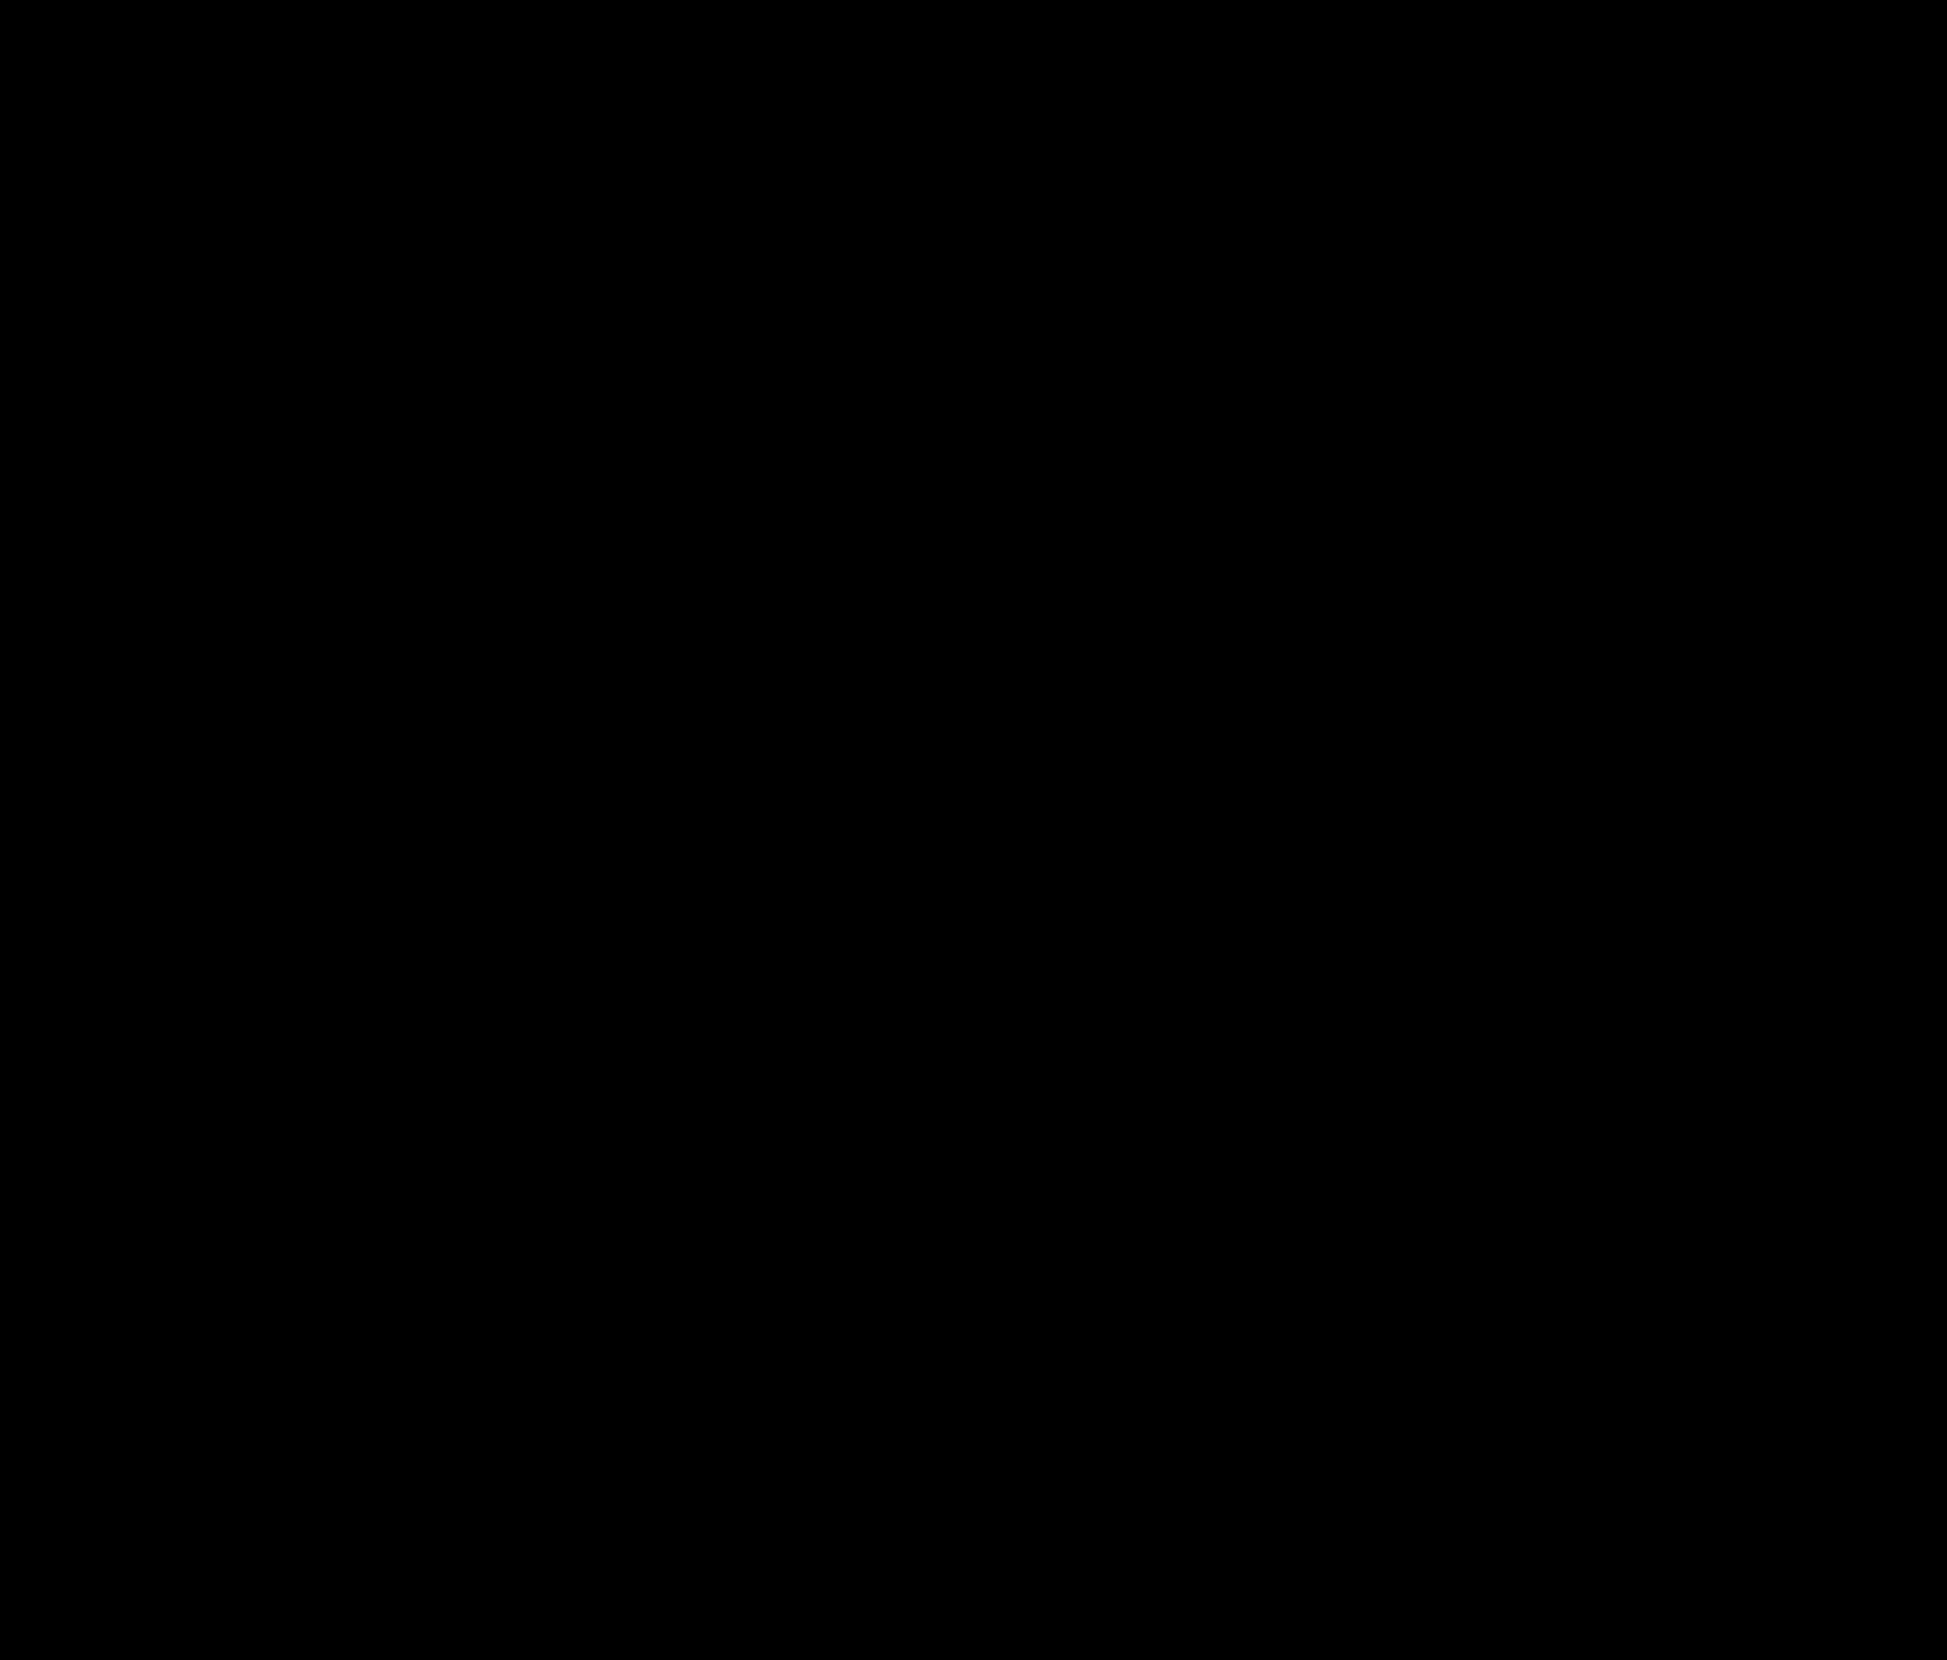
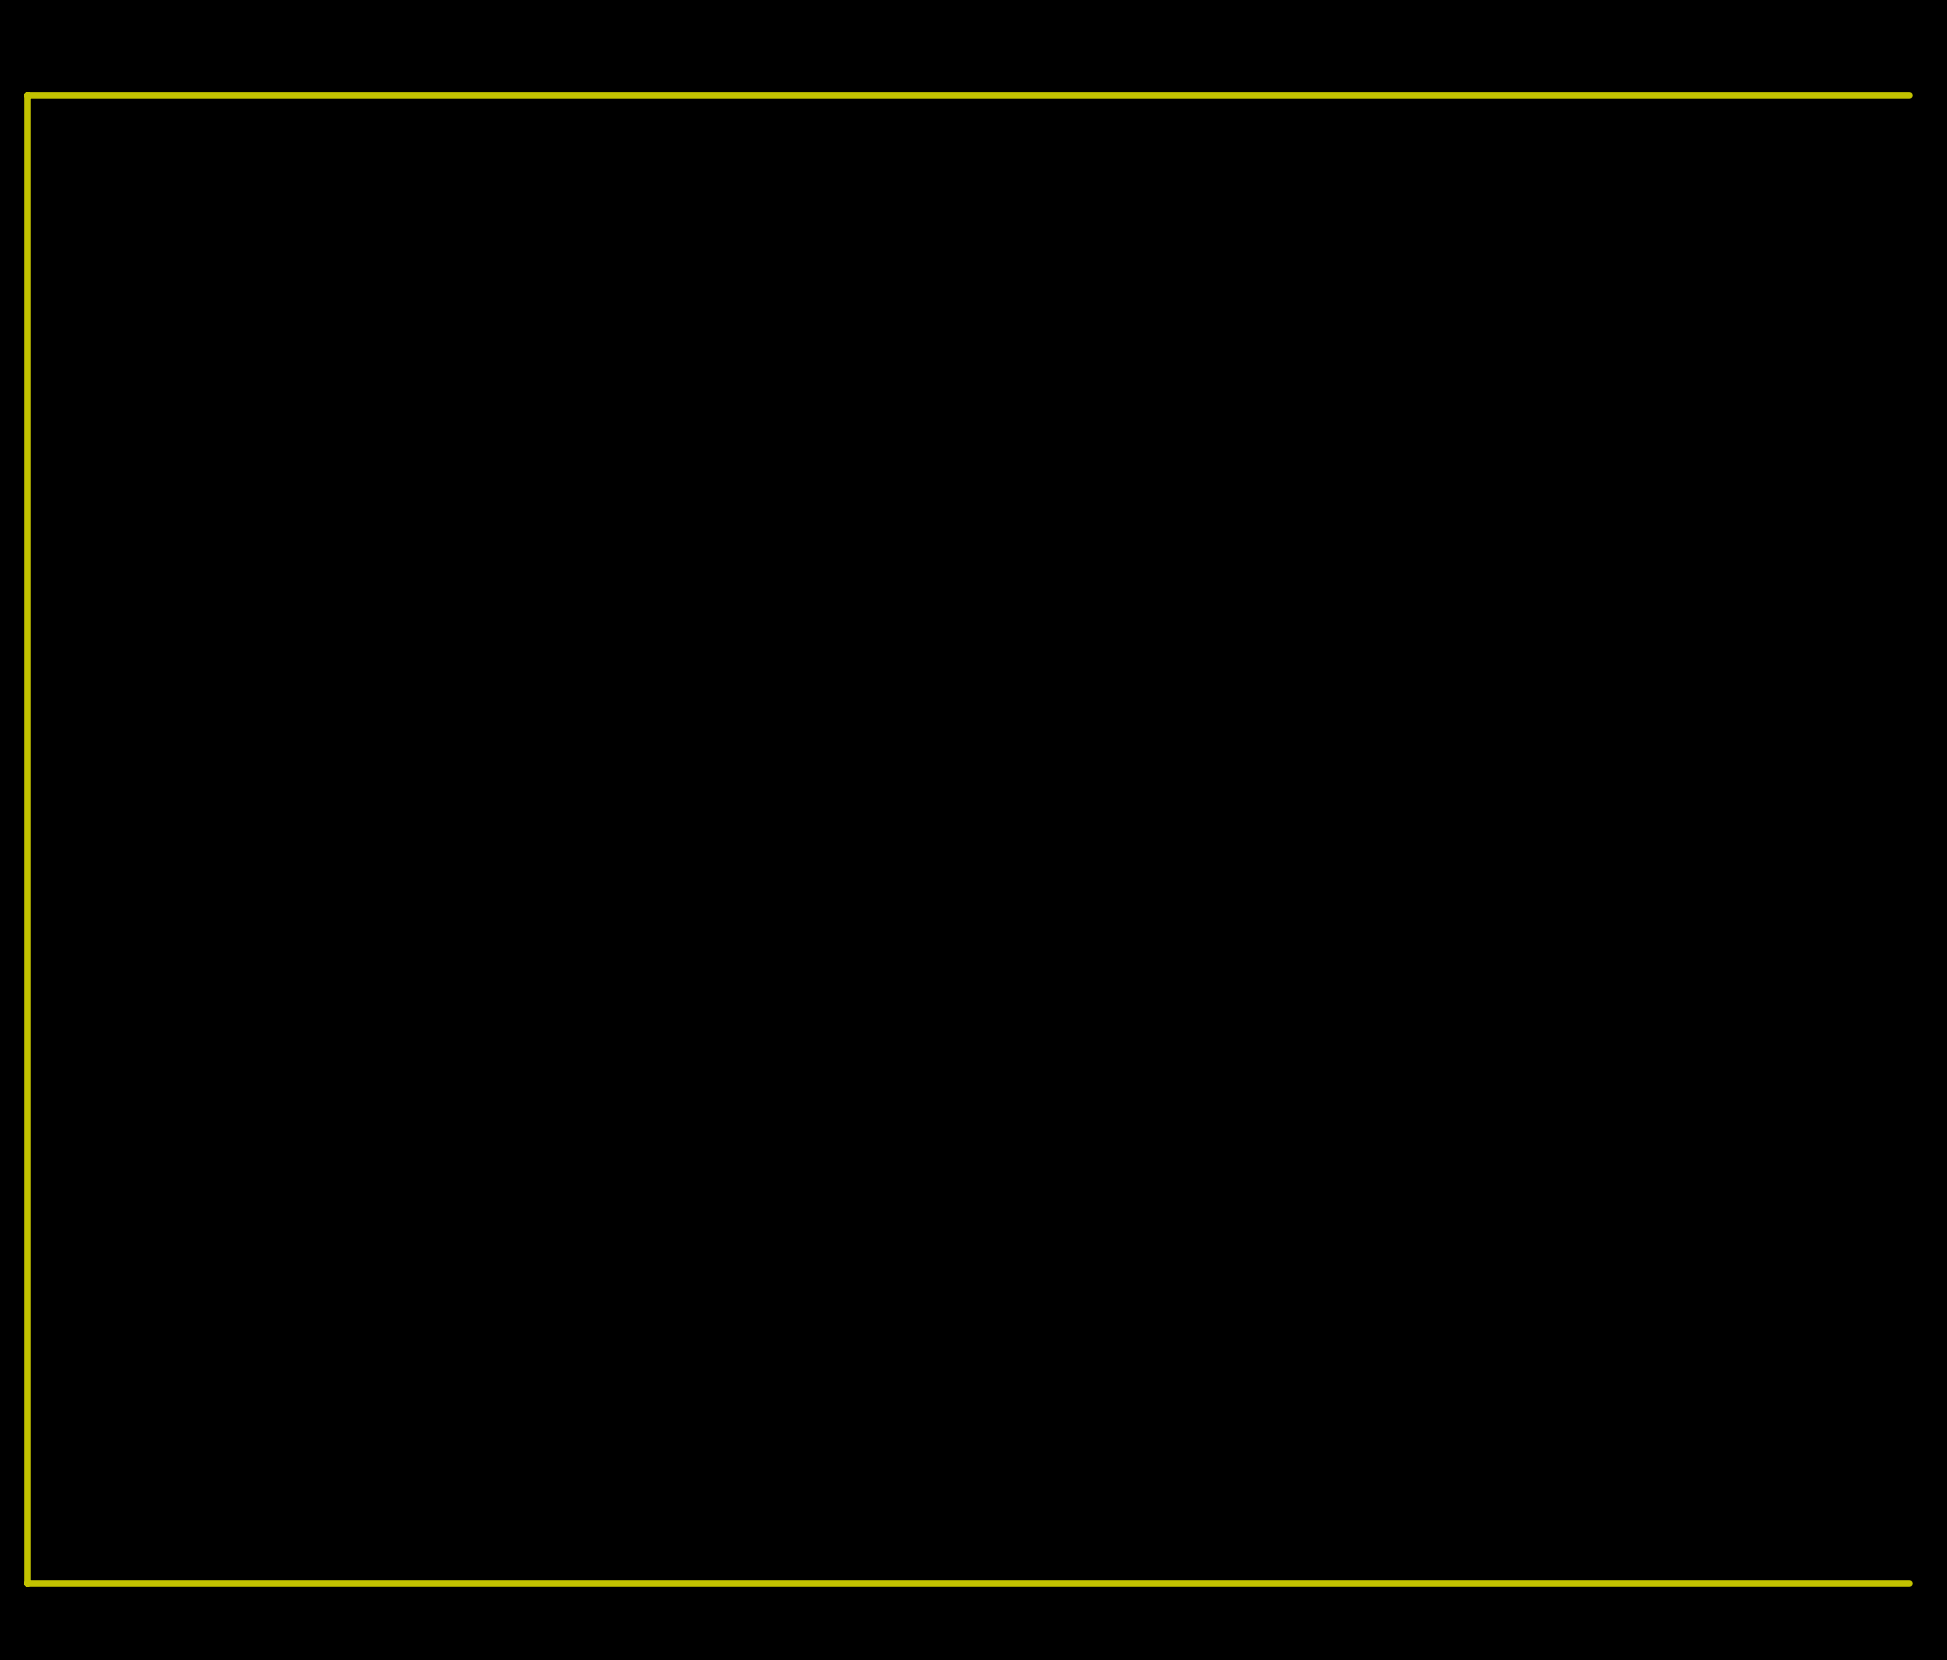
board edge: none -> (1909, 95) (27, 95) (27, 1583) (1909, 1583)

